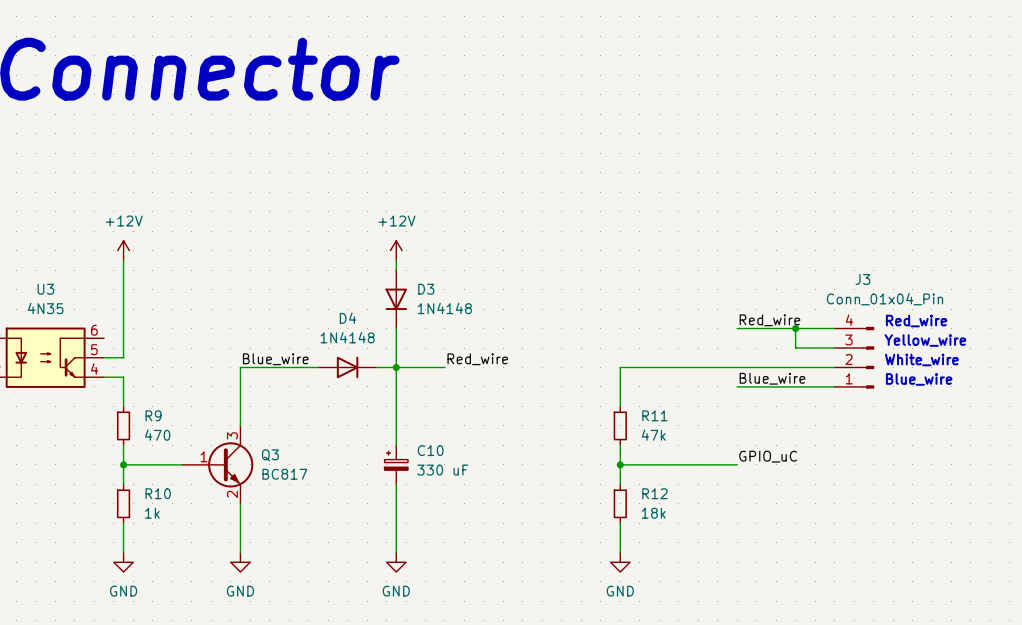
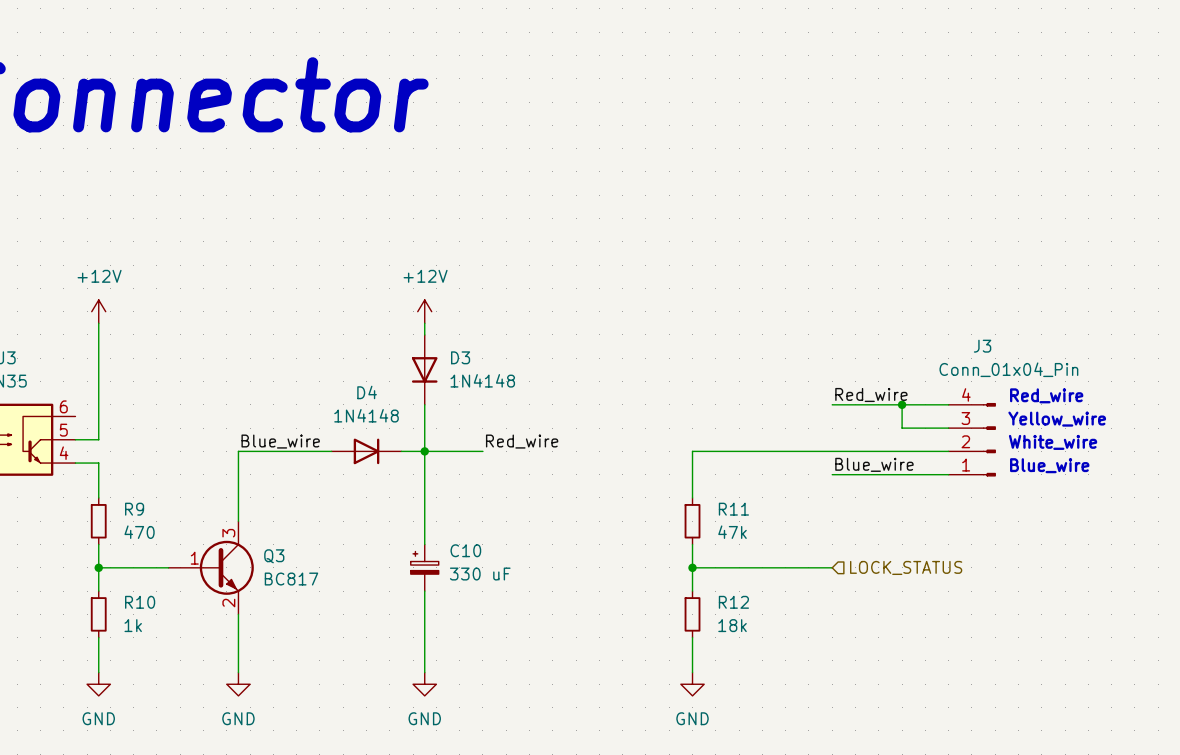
label: GPIO_uC (768, 456) -> none
hierarchical label: none -> LOCK_STATUS (906, 567)

